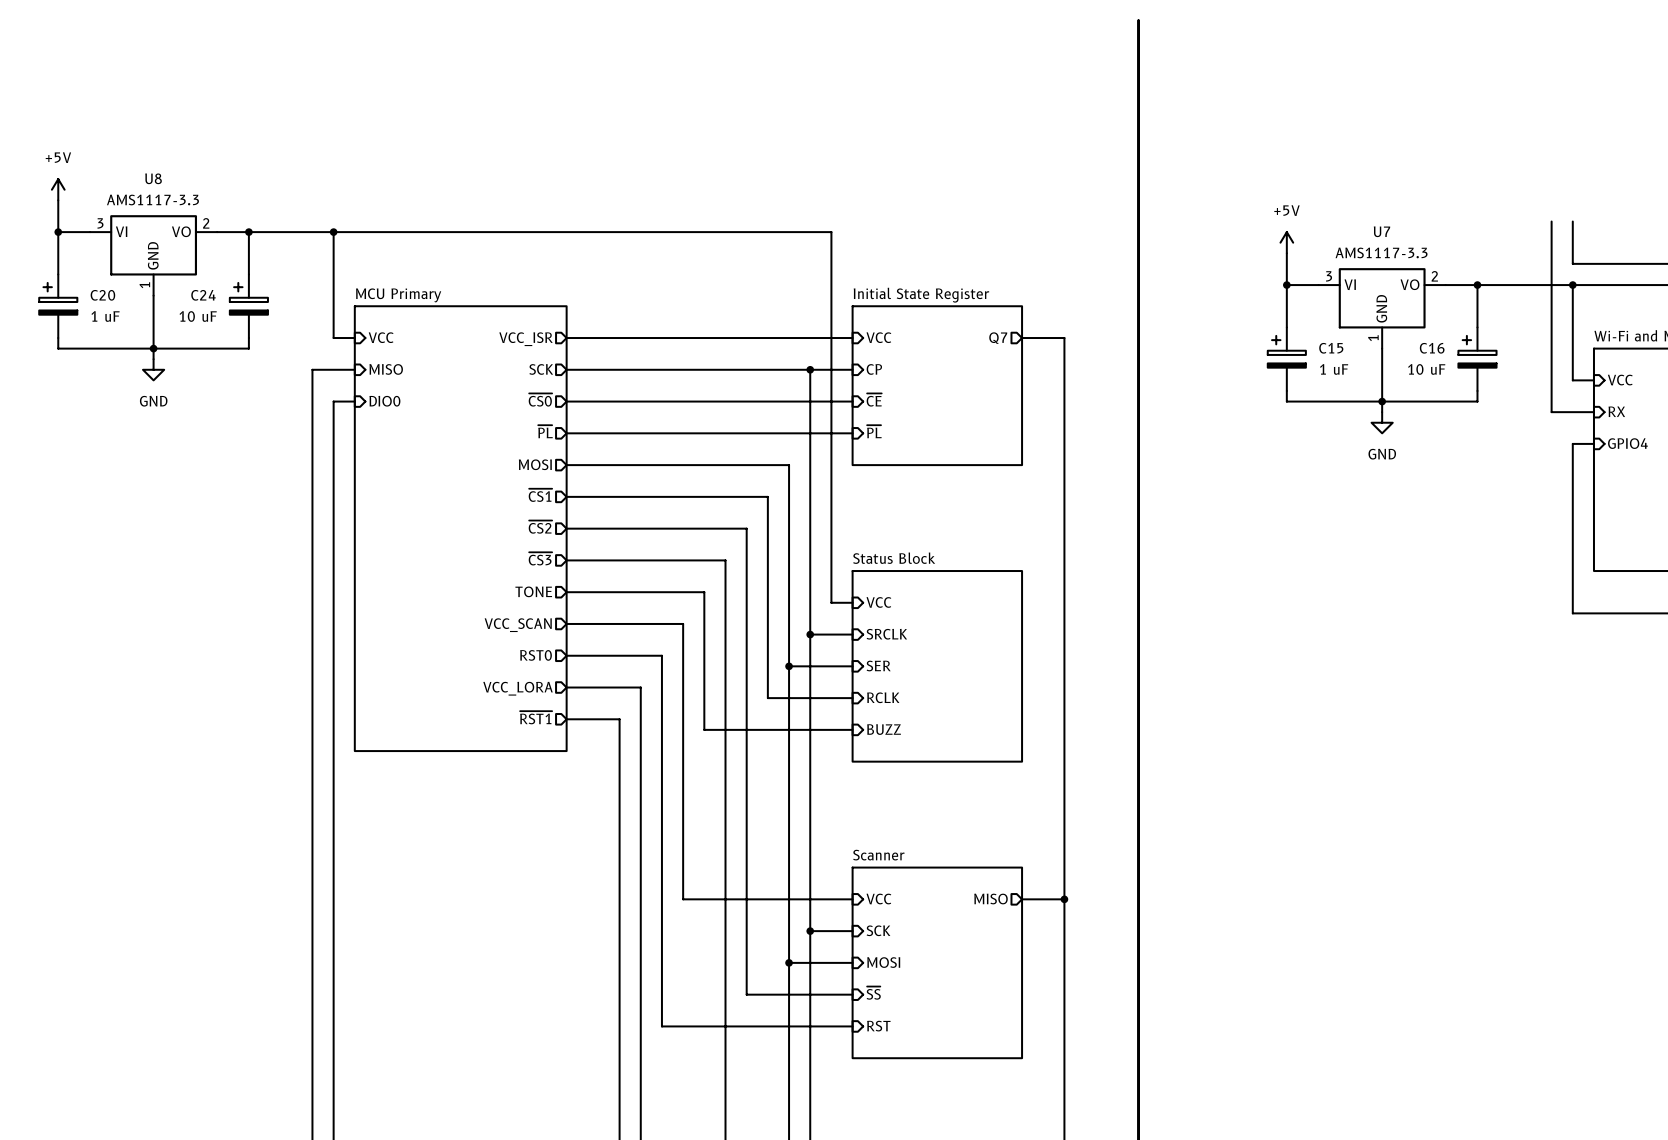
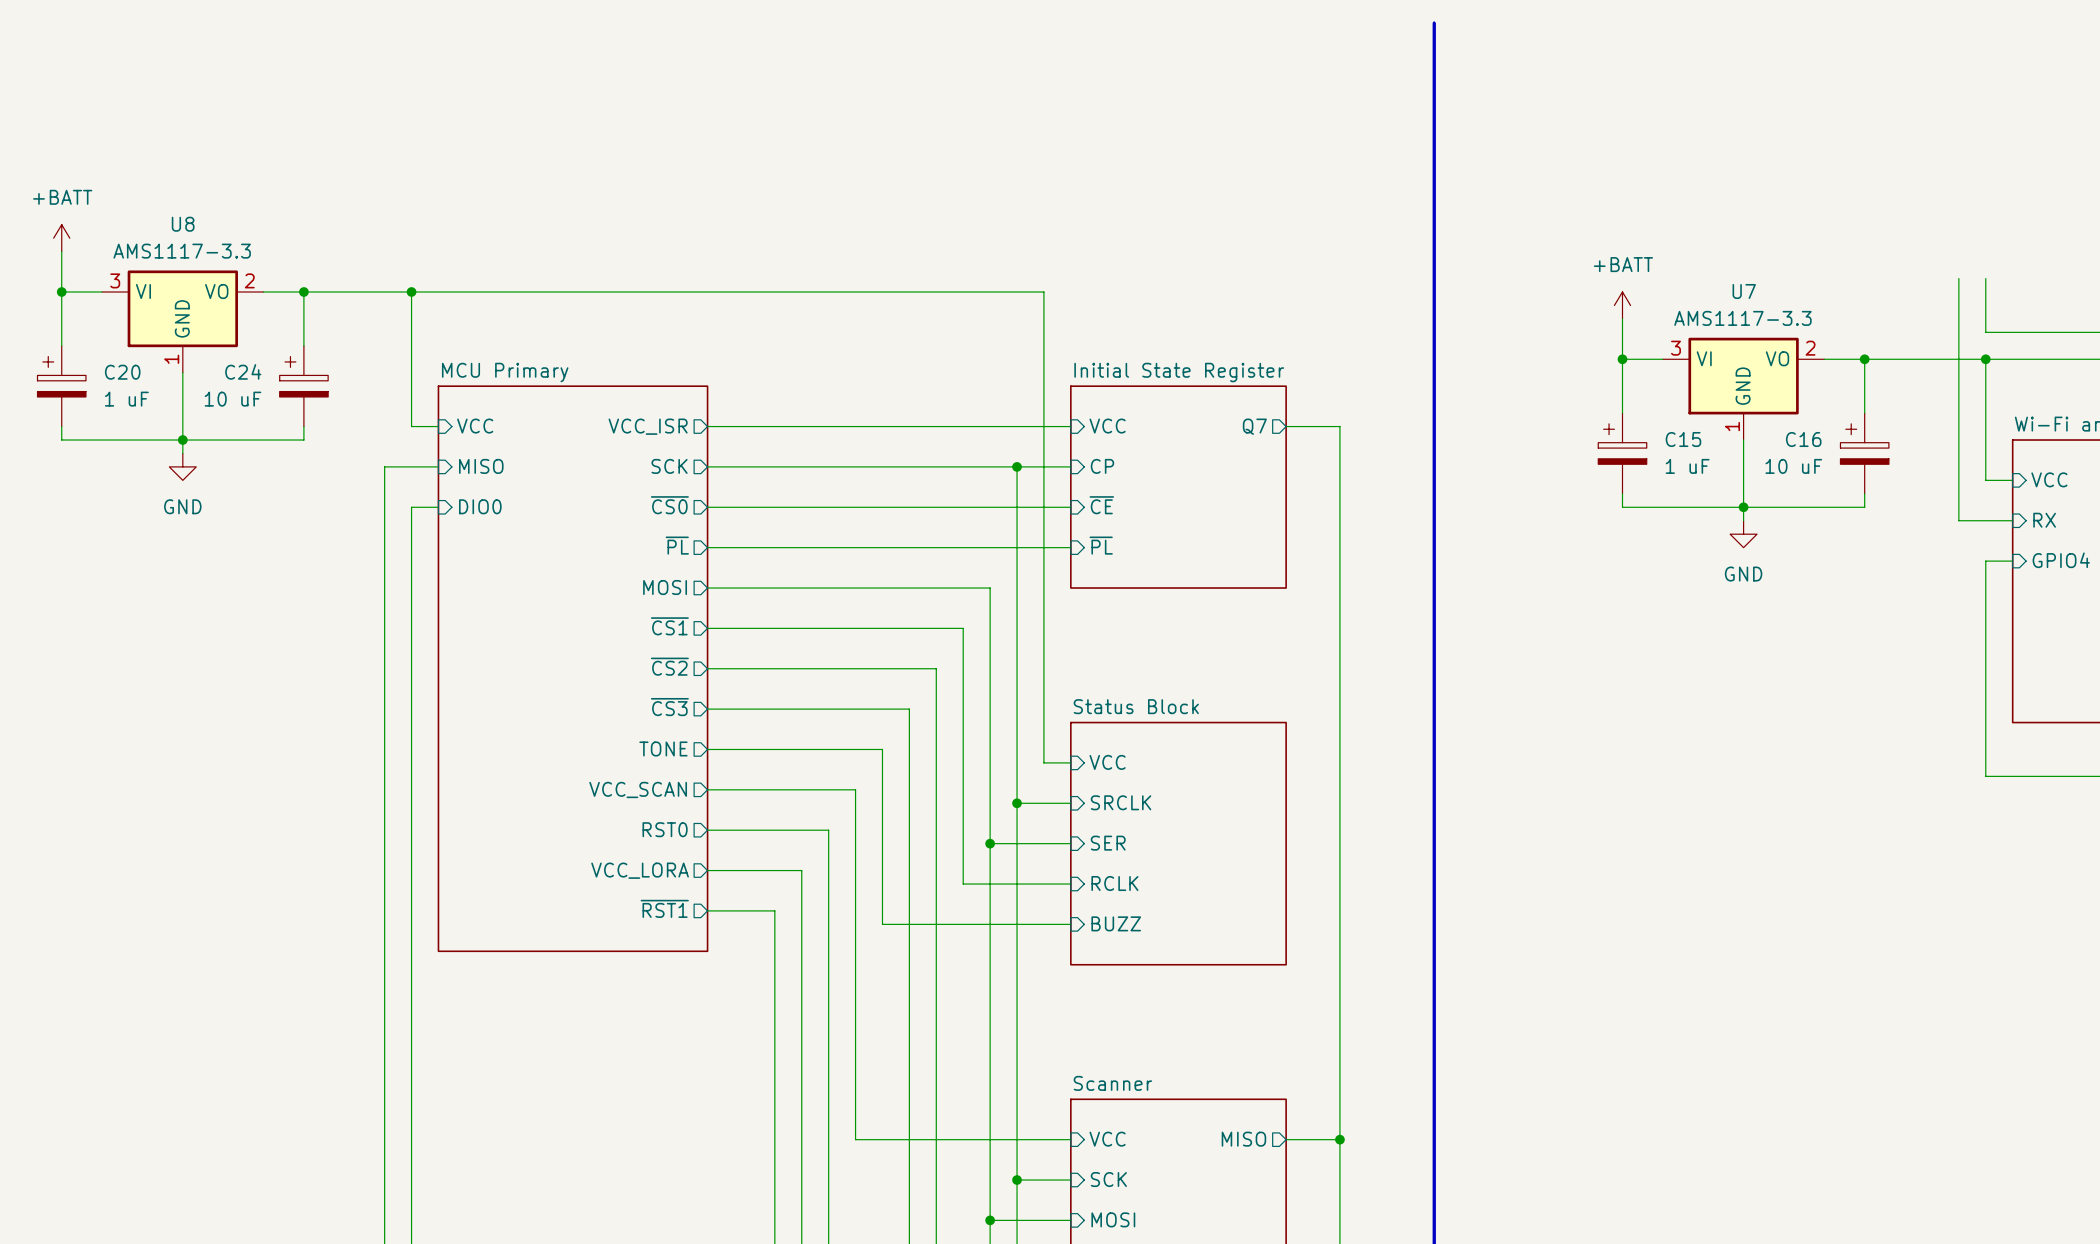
power symbol: +5V (58, 189) -> +BATT (61, 238)
power symbol: +5V (1286, 242) -> +BATT (1622, 305)

